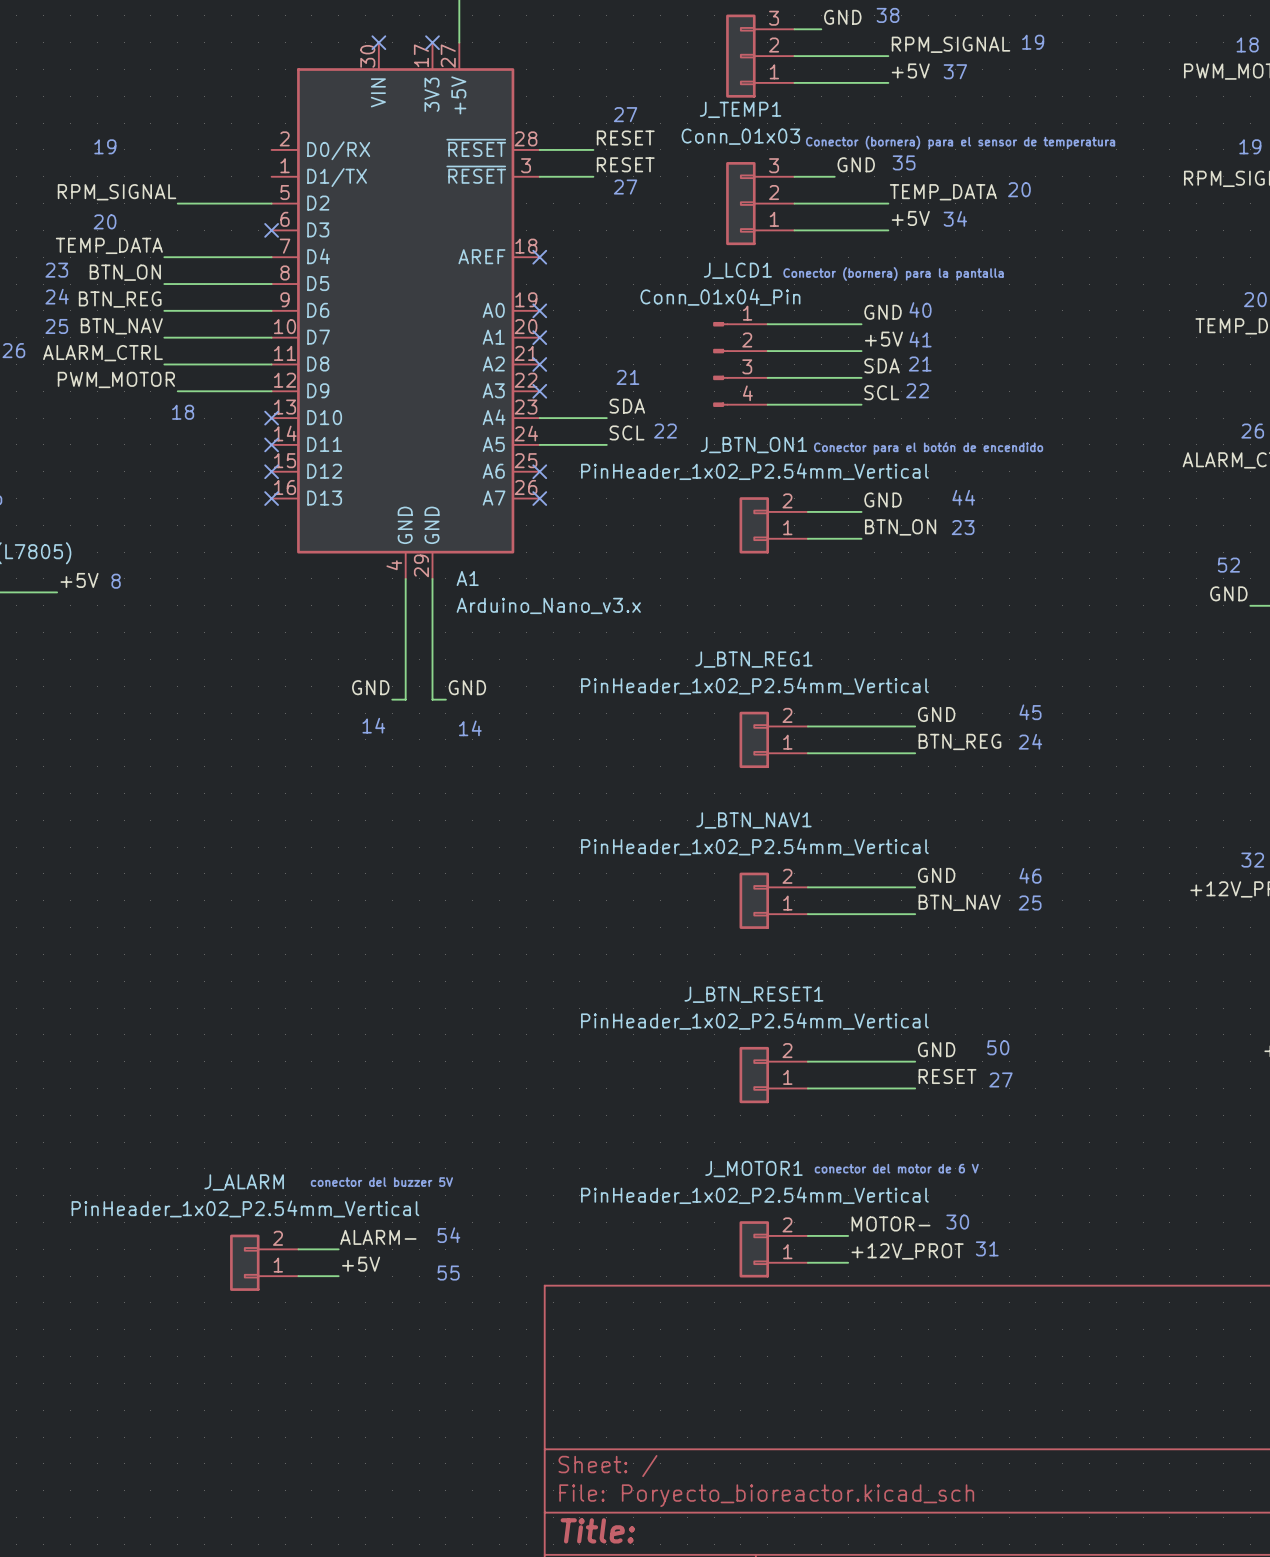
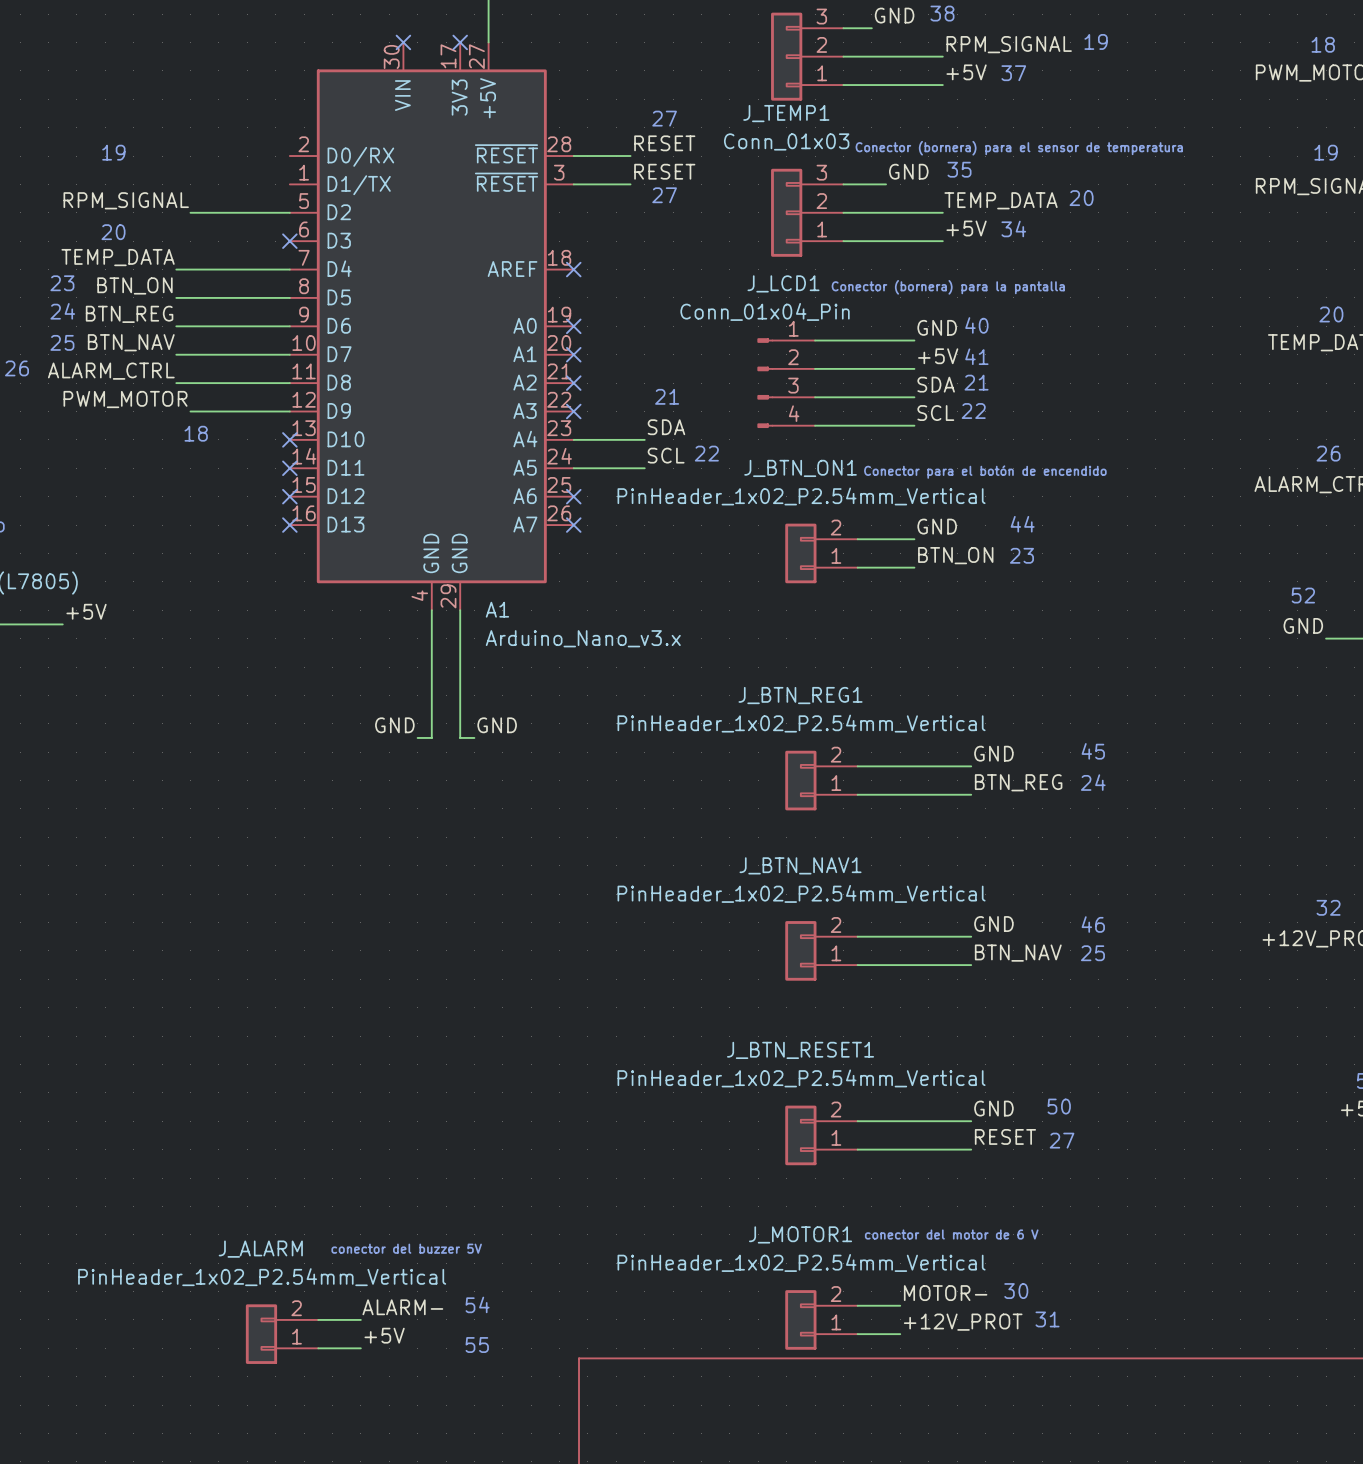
text: 8 (116, 581) -> none
text: 14 (373, 725) -> none
text: 14 (470, 728) -> none

